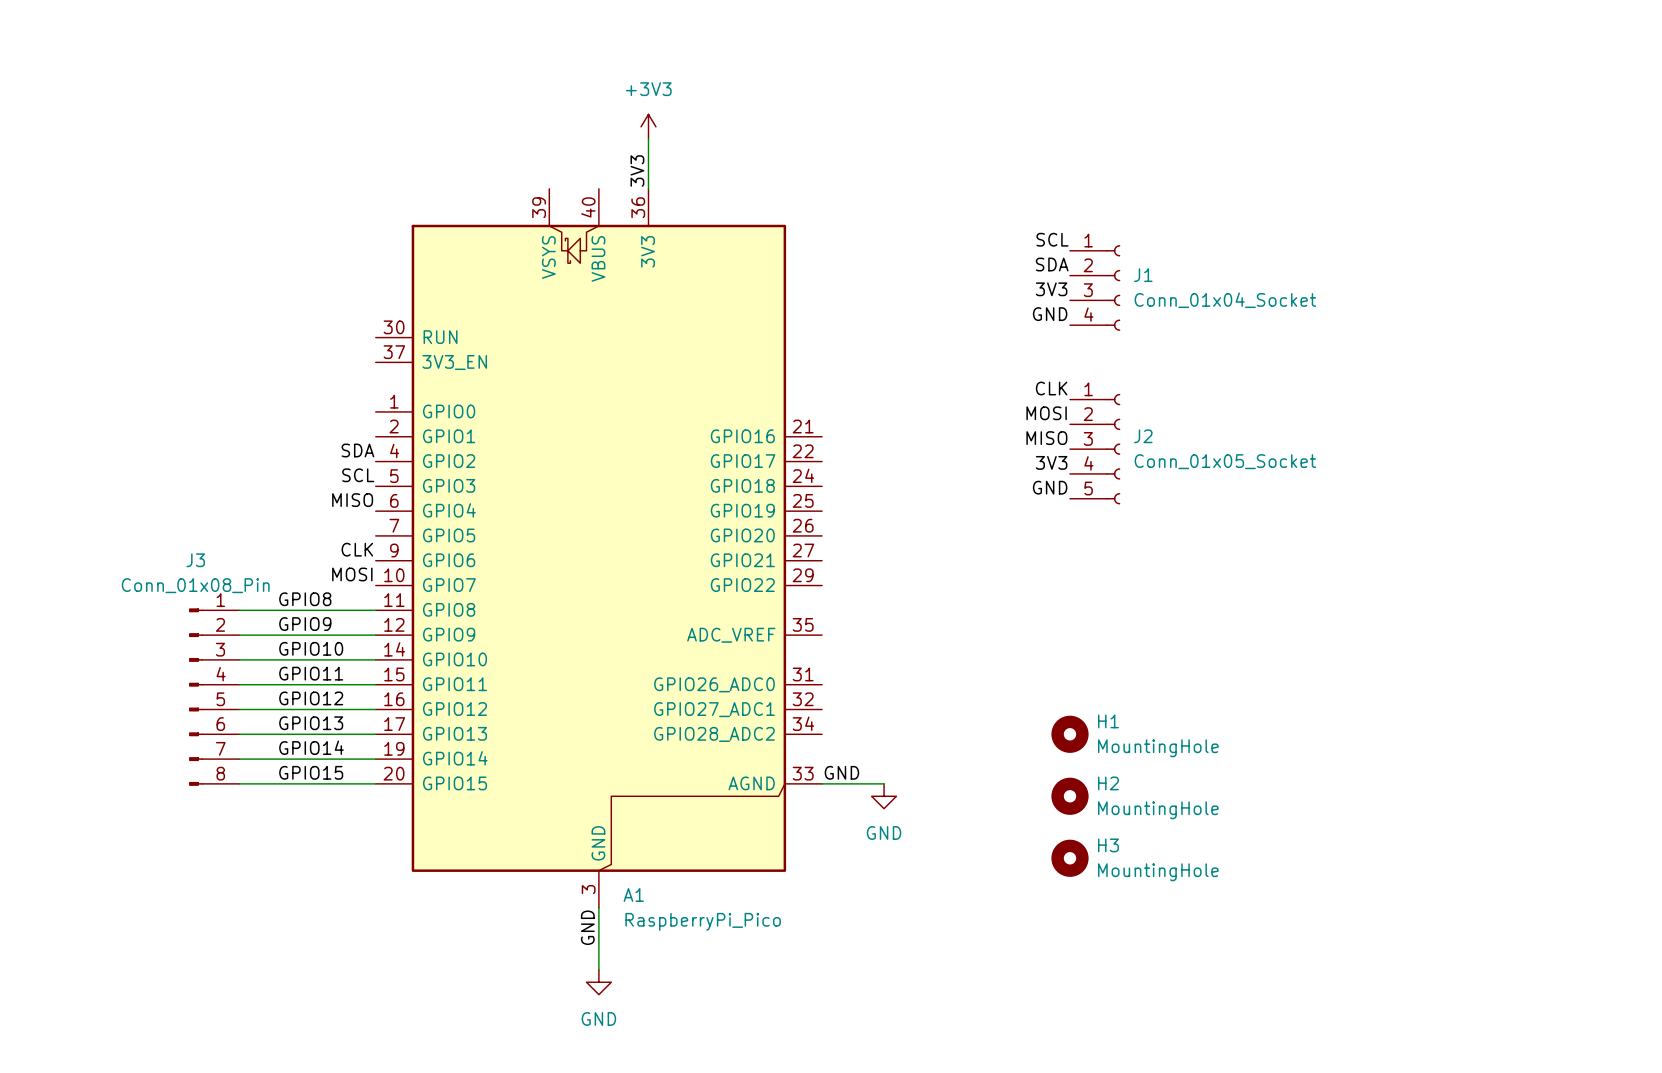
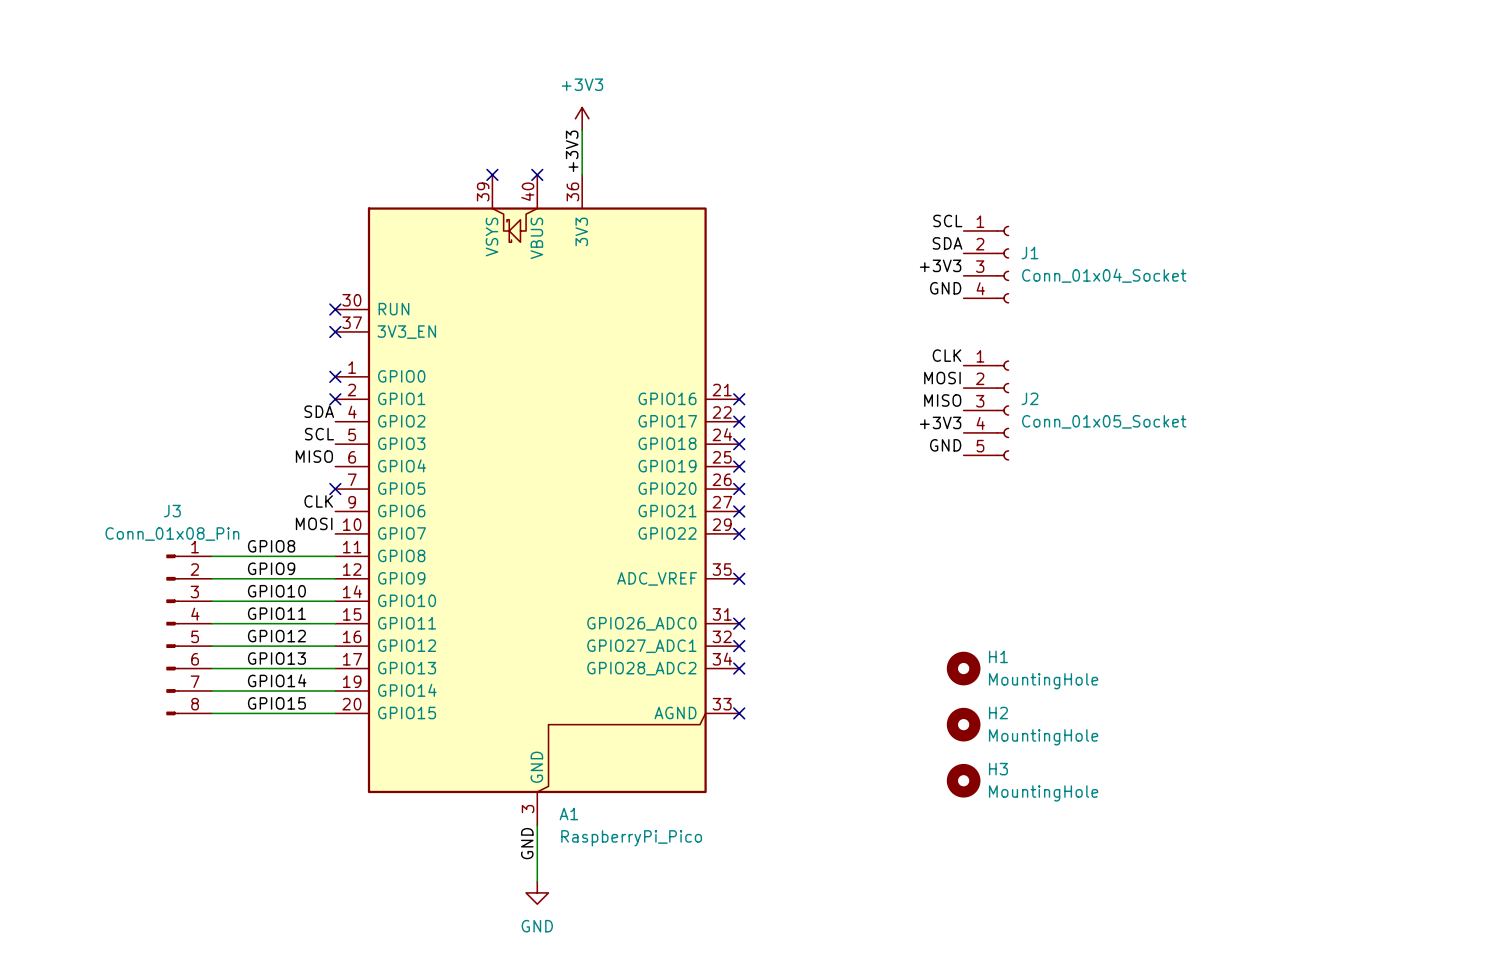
label: 3V3 (637, 171) -> +3V3 (572, 151)
no-connect mark: none -> (492, 174)
no-connect mark: none -> (537, 174)
label: 3V3 (1051, 289) -> +3V3 (940, 265)
no-connect mark: none -> (335, 309)
no-connect mark: none -> (335, 331)
no-connect mark: none -> (335, 376)
no-connect mark: none -> (335, 399)
no-connect mark: none -> (739, 399)
no-connect mark: none -> (739, 421)
label: 3V3 (1051, 462) -> +3V3 (940, 422)
no-connect mark: none -> (739, 444)
no-connect mark: none -> (739, 466)
no-connect mark: none -> (335, 489)
no-connect mark: none -> (739, 489)
no-connect mark: none -> (739, 511)
no-connect mark: none -> (739, 533)
no-connect mark: none -> (739, 578)
no-connect mark: none -> (739, 623)
no-connect mark: none -> (739, 646)
no-connect mark: none -> (739, 668)
label: GND (841, 772) -> none
wire: (822, 783) (884, 783) -> none
no-connect mark: none -> (739, 713)
power symbol: GND (884, 796) -> none

